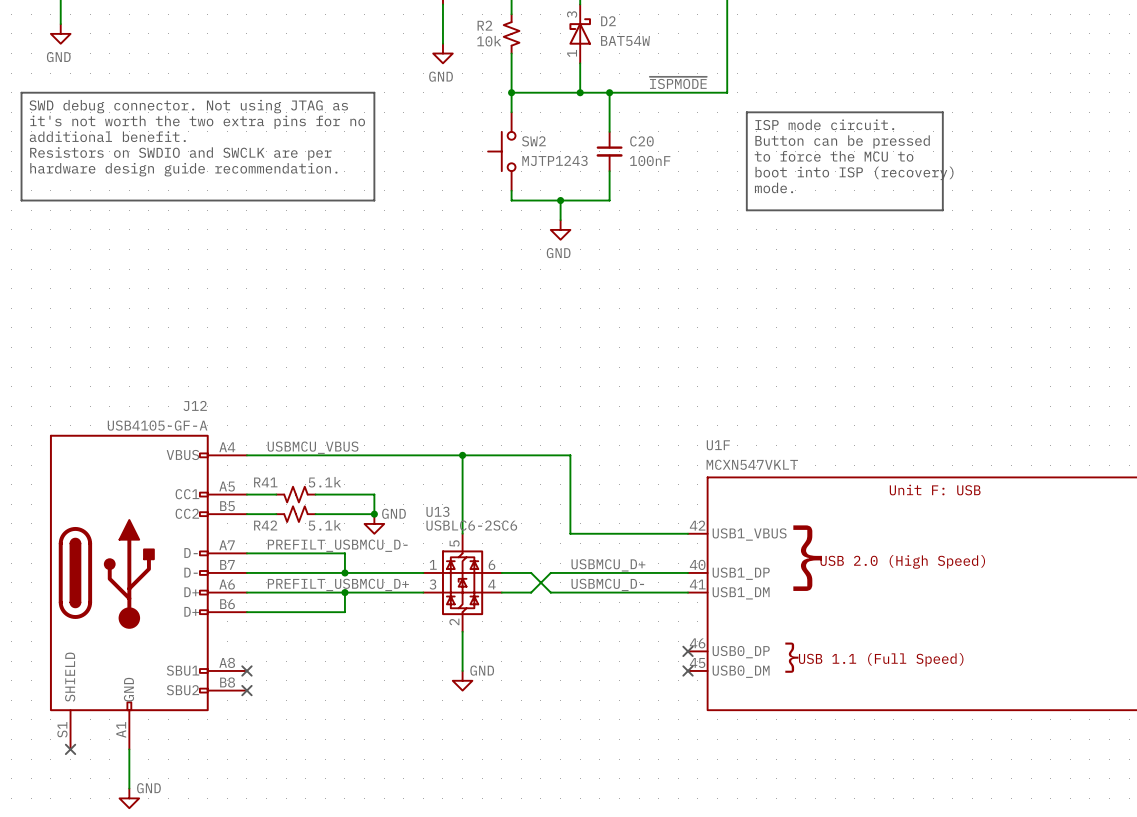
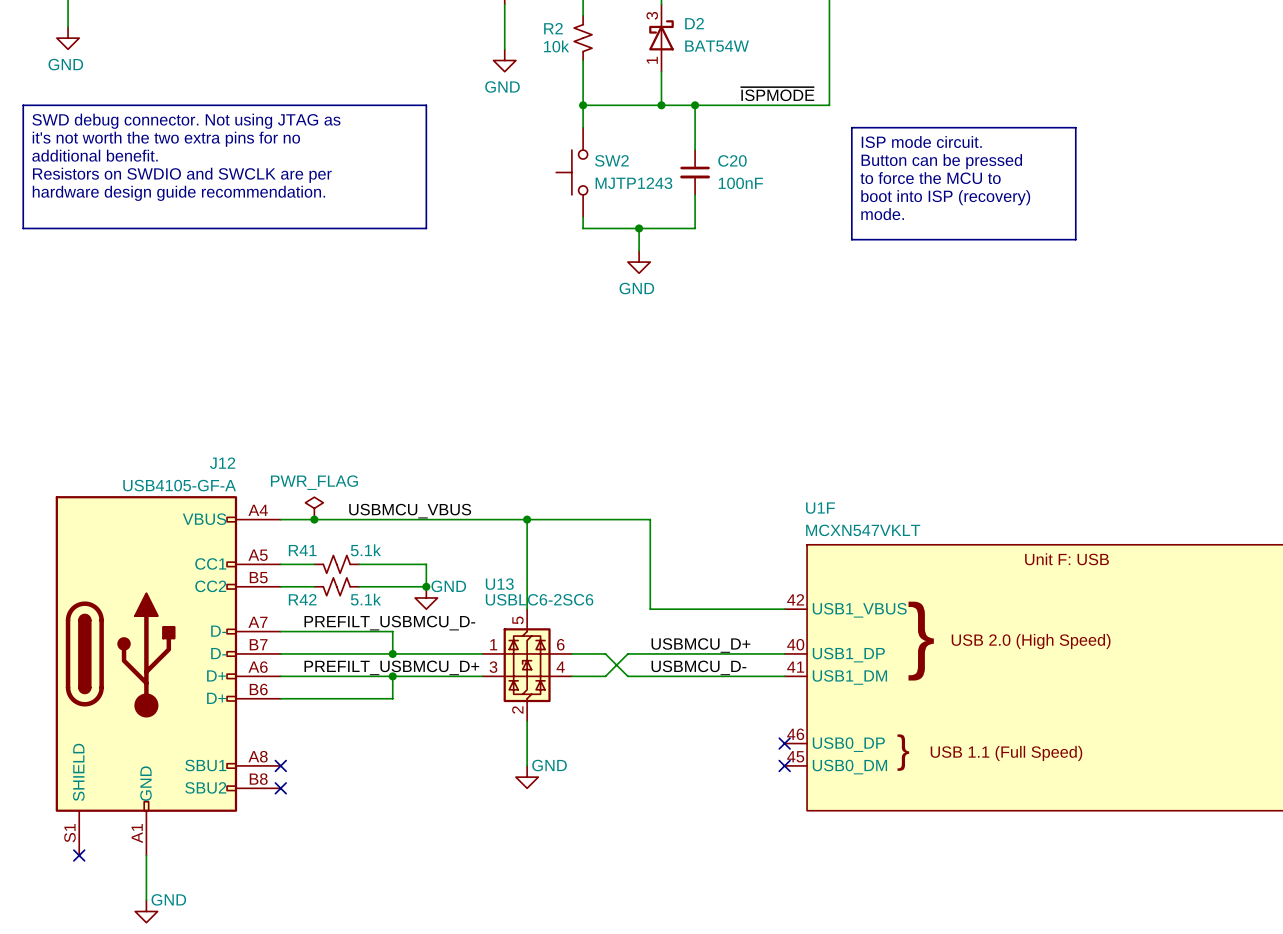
power symbol: none -> PWR_FLAG (314, 508)
label position: USBMCU_VBUS (313, 447) -> USBMCU_VBUS (410, 511)
junction: none -> (314, 519)

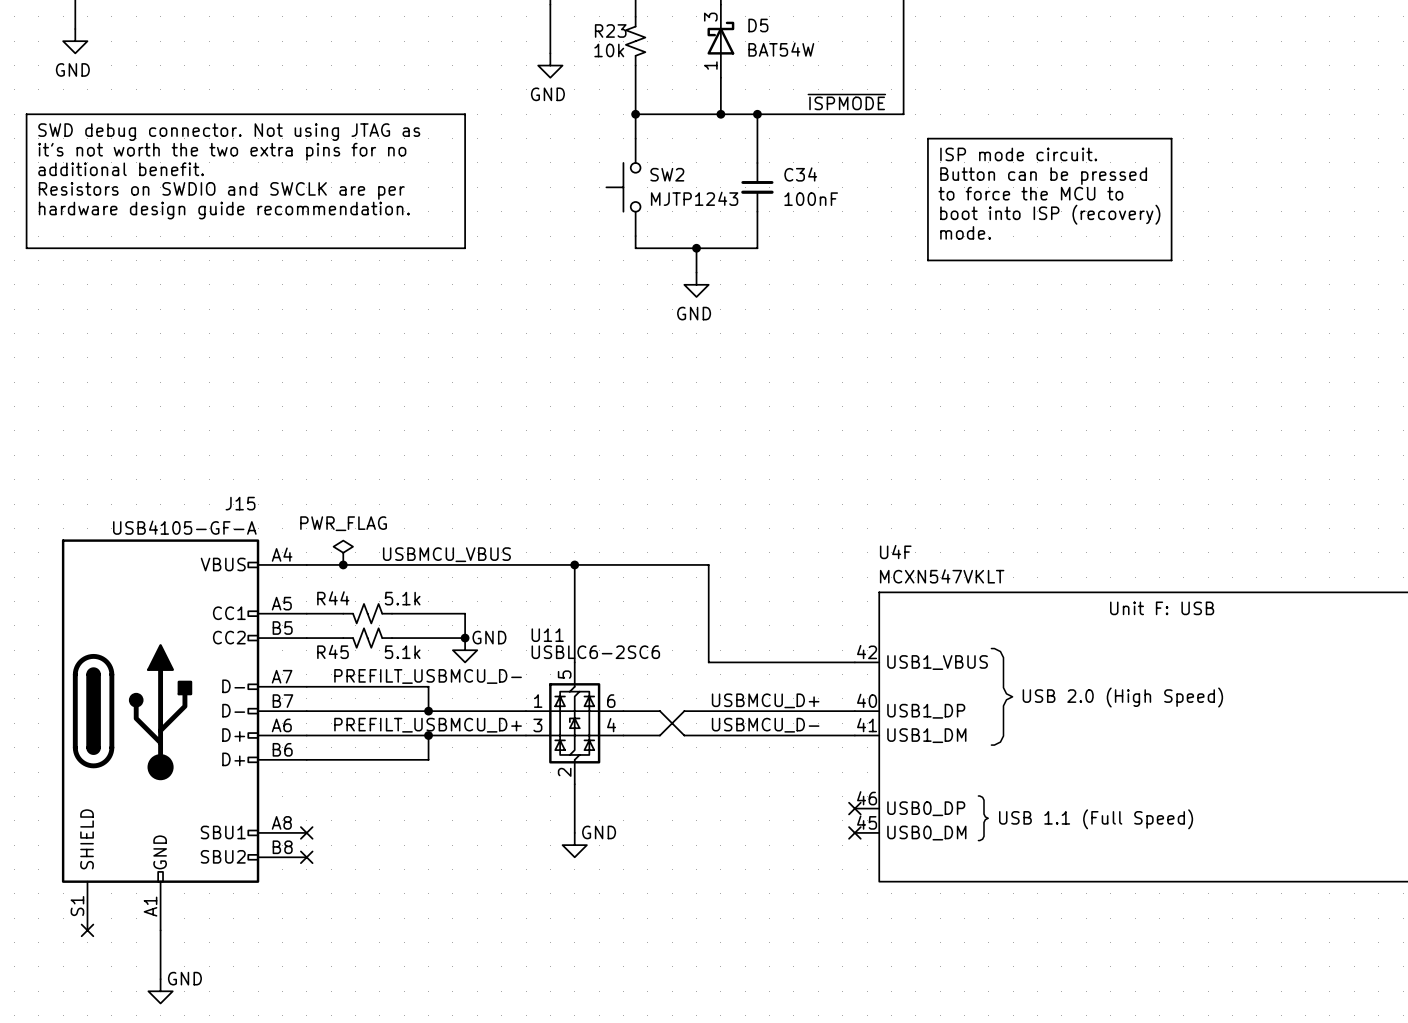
D2 name: D2 (694, 23) -> D5 (758, 25)
R2 name: R2 (553, 28) -> R23 (610, 30)
C20 name: C20 (732, 160) -> C34 (800, 174)
J12 name: J12 (222, 463) -> J15 (240, 503)
U1F name: U1F (820, 508) -> U4F (895, 552)
R41 name: R41 (302, 550) -> R44 (333, 598)
U13 name: U13 (499, 584) -> U11 (547, 635)
R42 name: R42 (302, 599) -> R45 (332, 651)

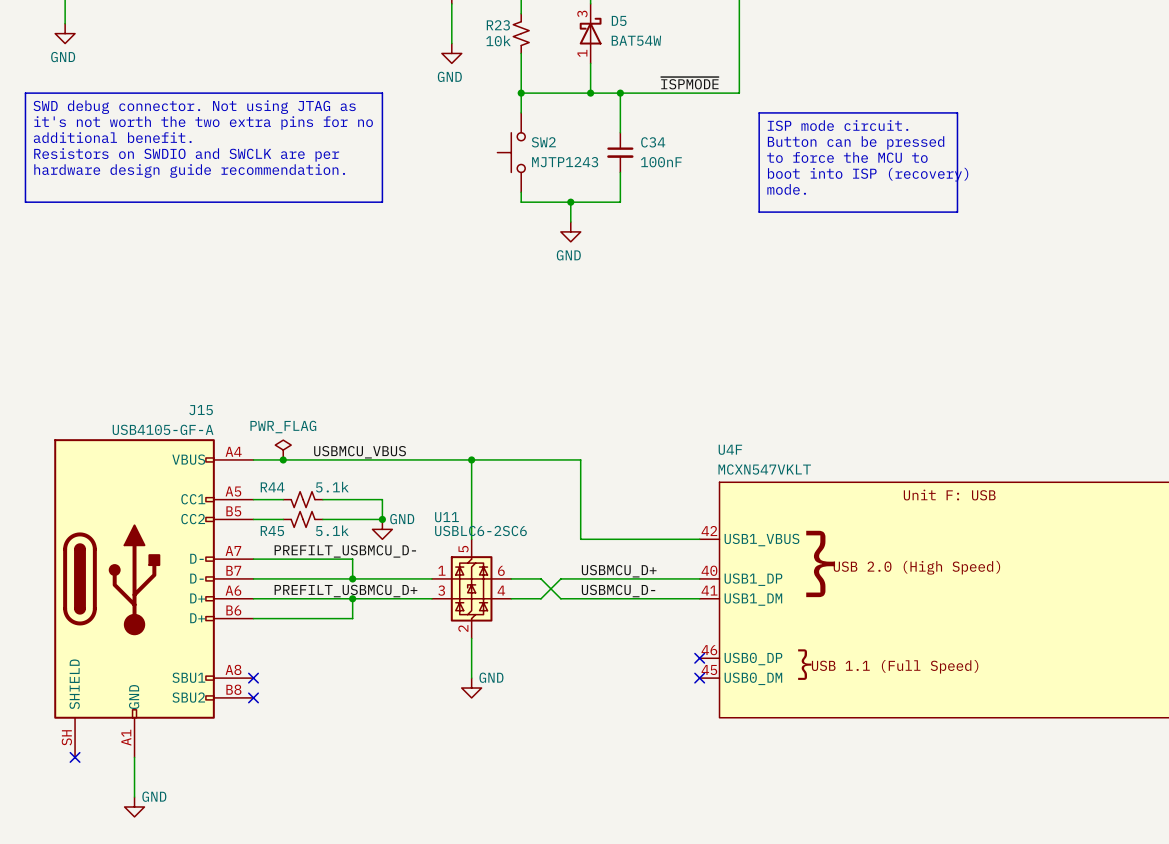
J15 pin number: S1 (77, 906) -> SH (66, 737)

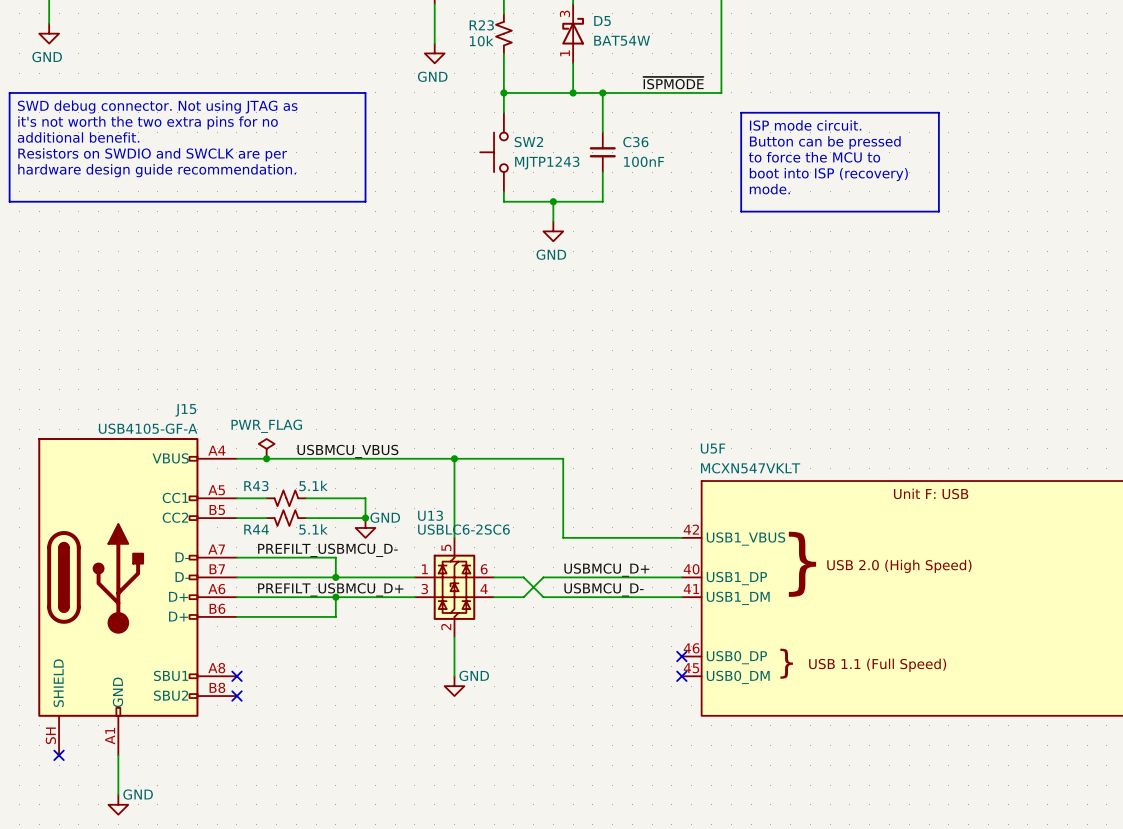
C34: 100nF (620, 152) -> none
C36: none -> 100nF (602, 152)
U4F name: U4F (730, 449) -> U5F (713, 448)
R44 name: R44 (272, 487) -> R43 (256, 486)
U11 name: U11 (446, 517) -> U13 (430, 515)
R45 name: R45 (272, 531) -> R44 (256, 529)

